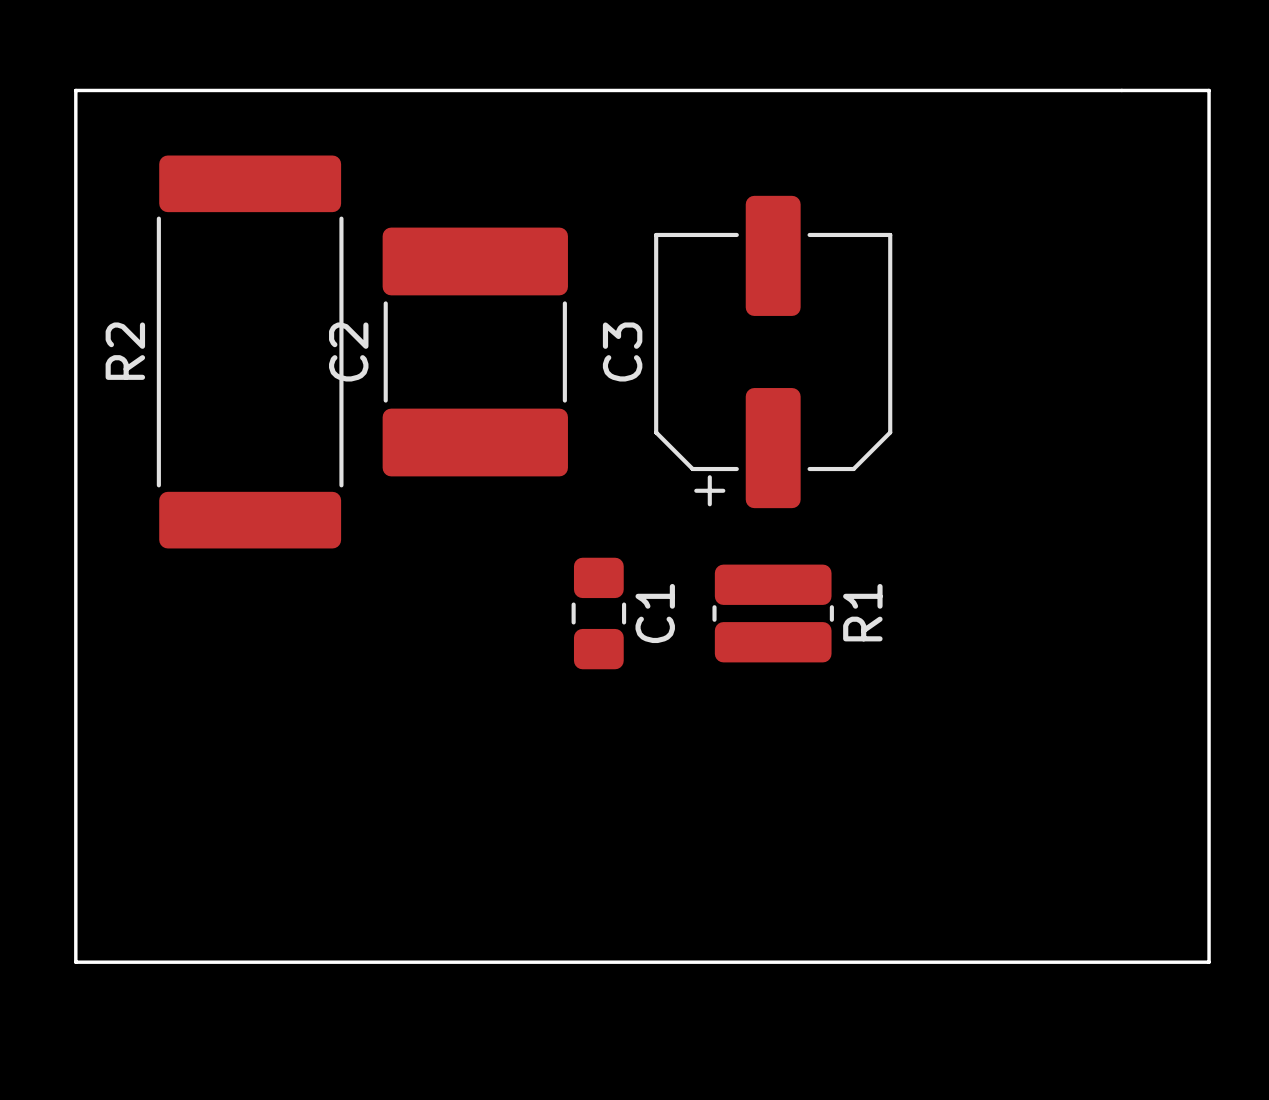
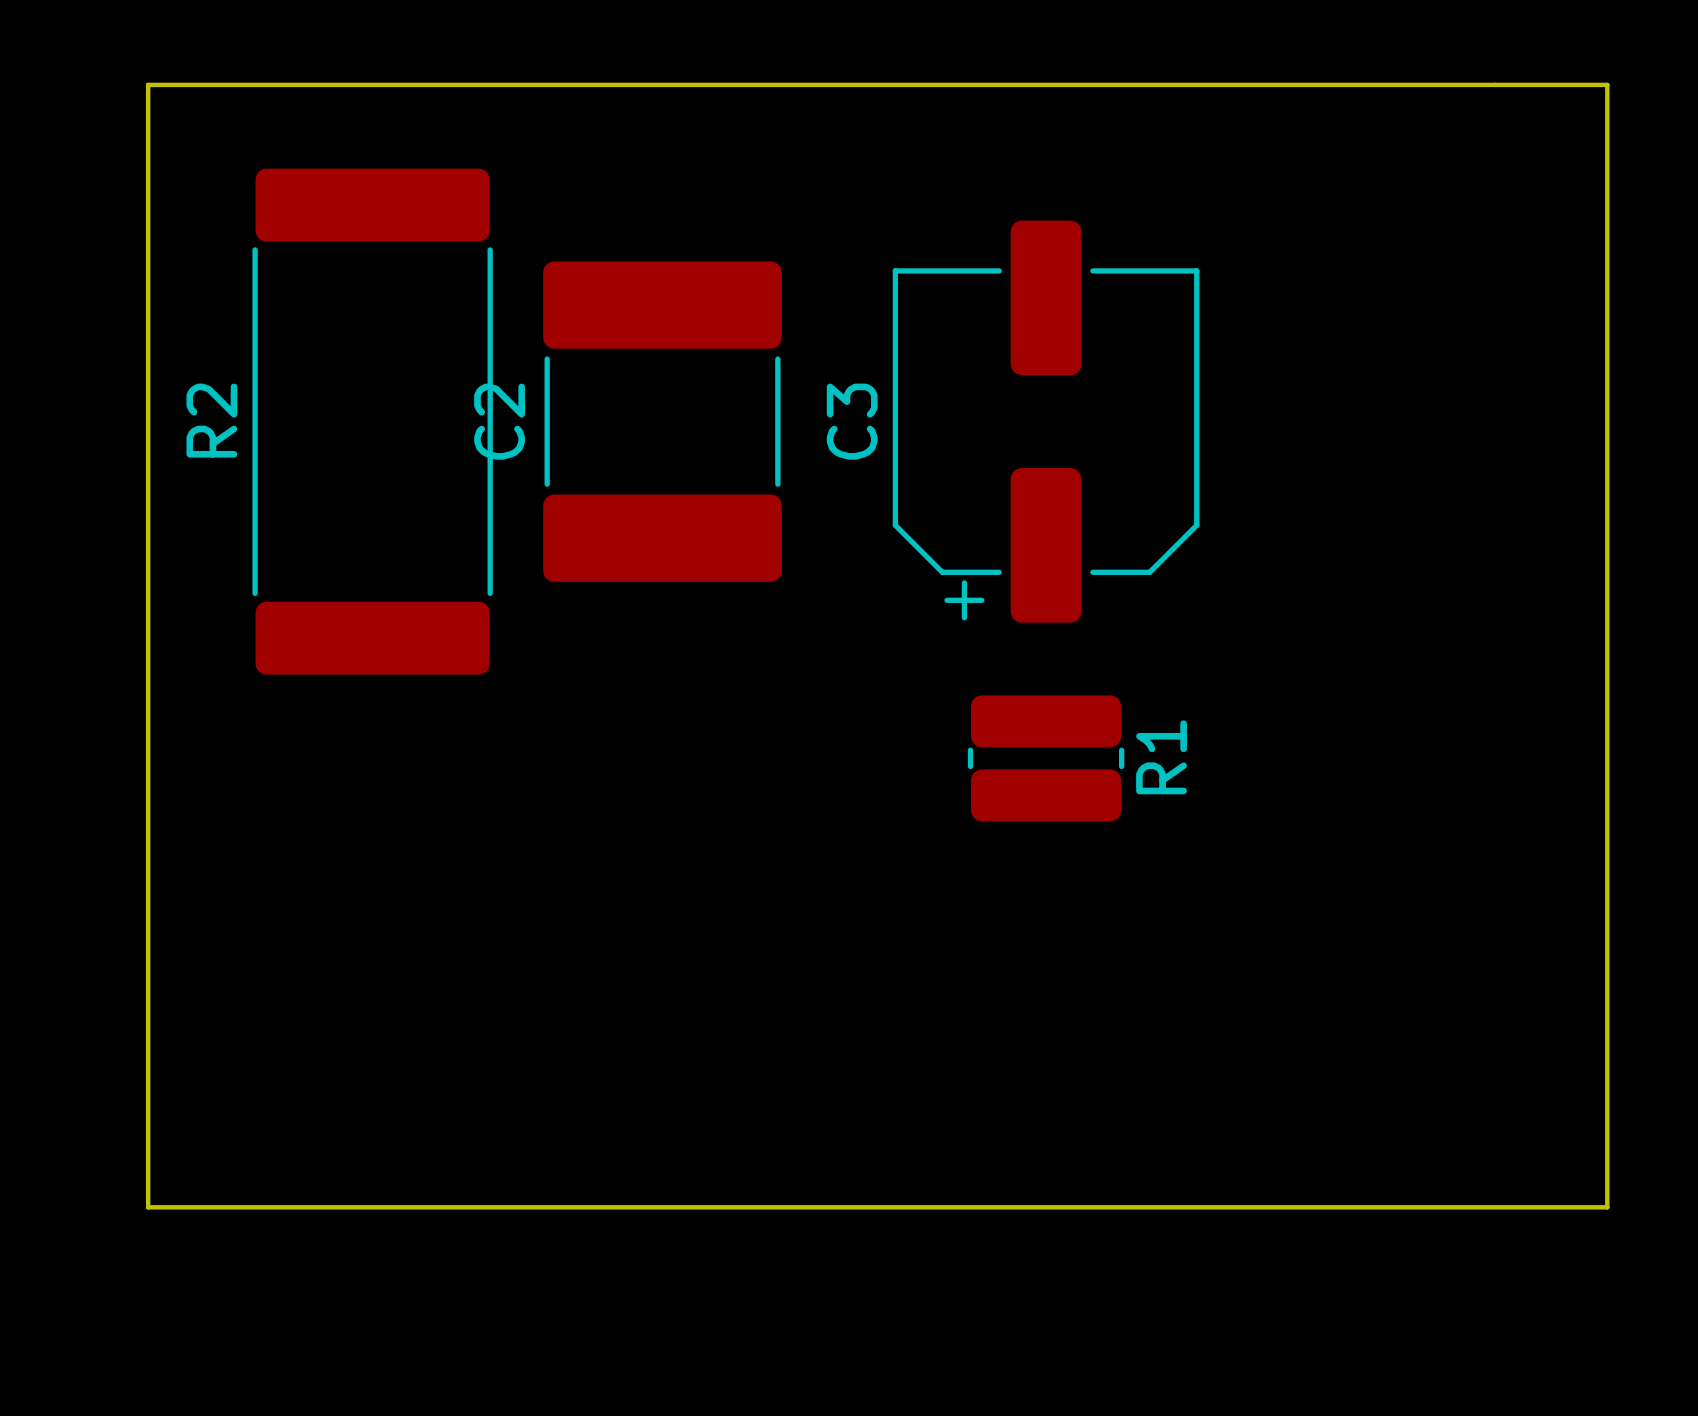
C1: (598, 613) -> none

